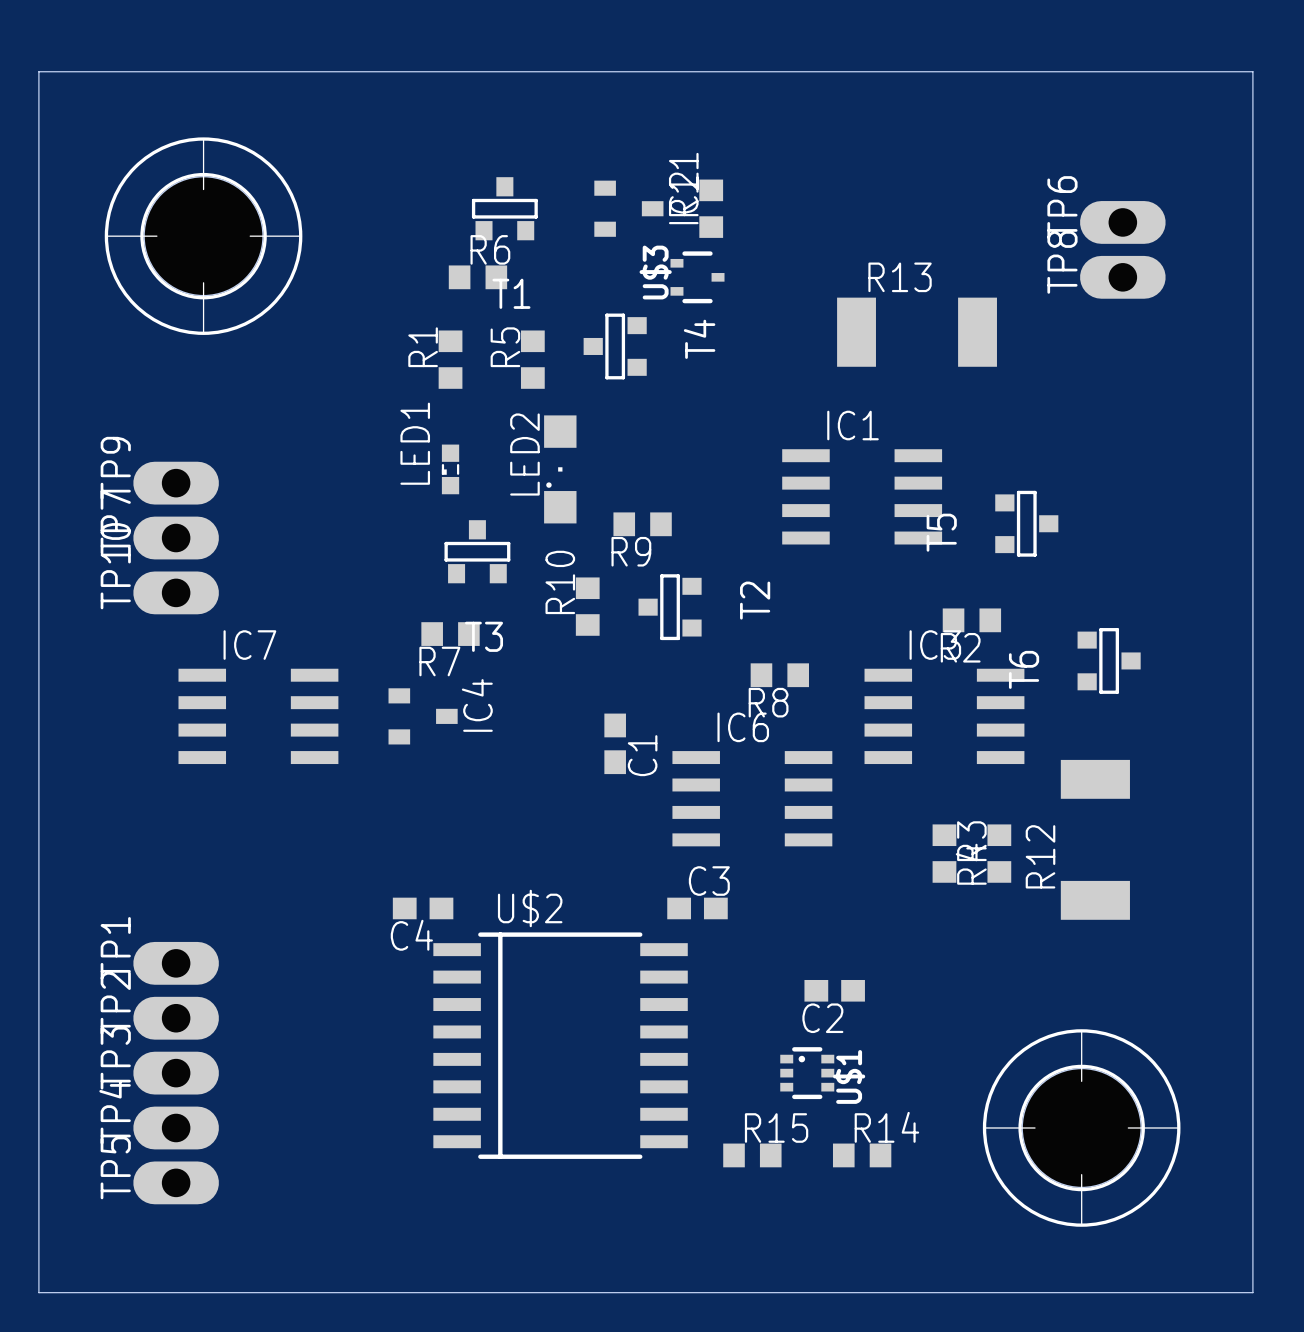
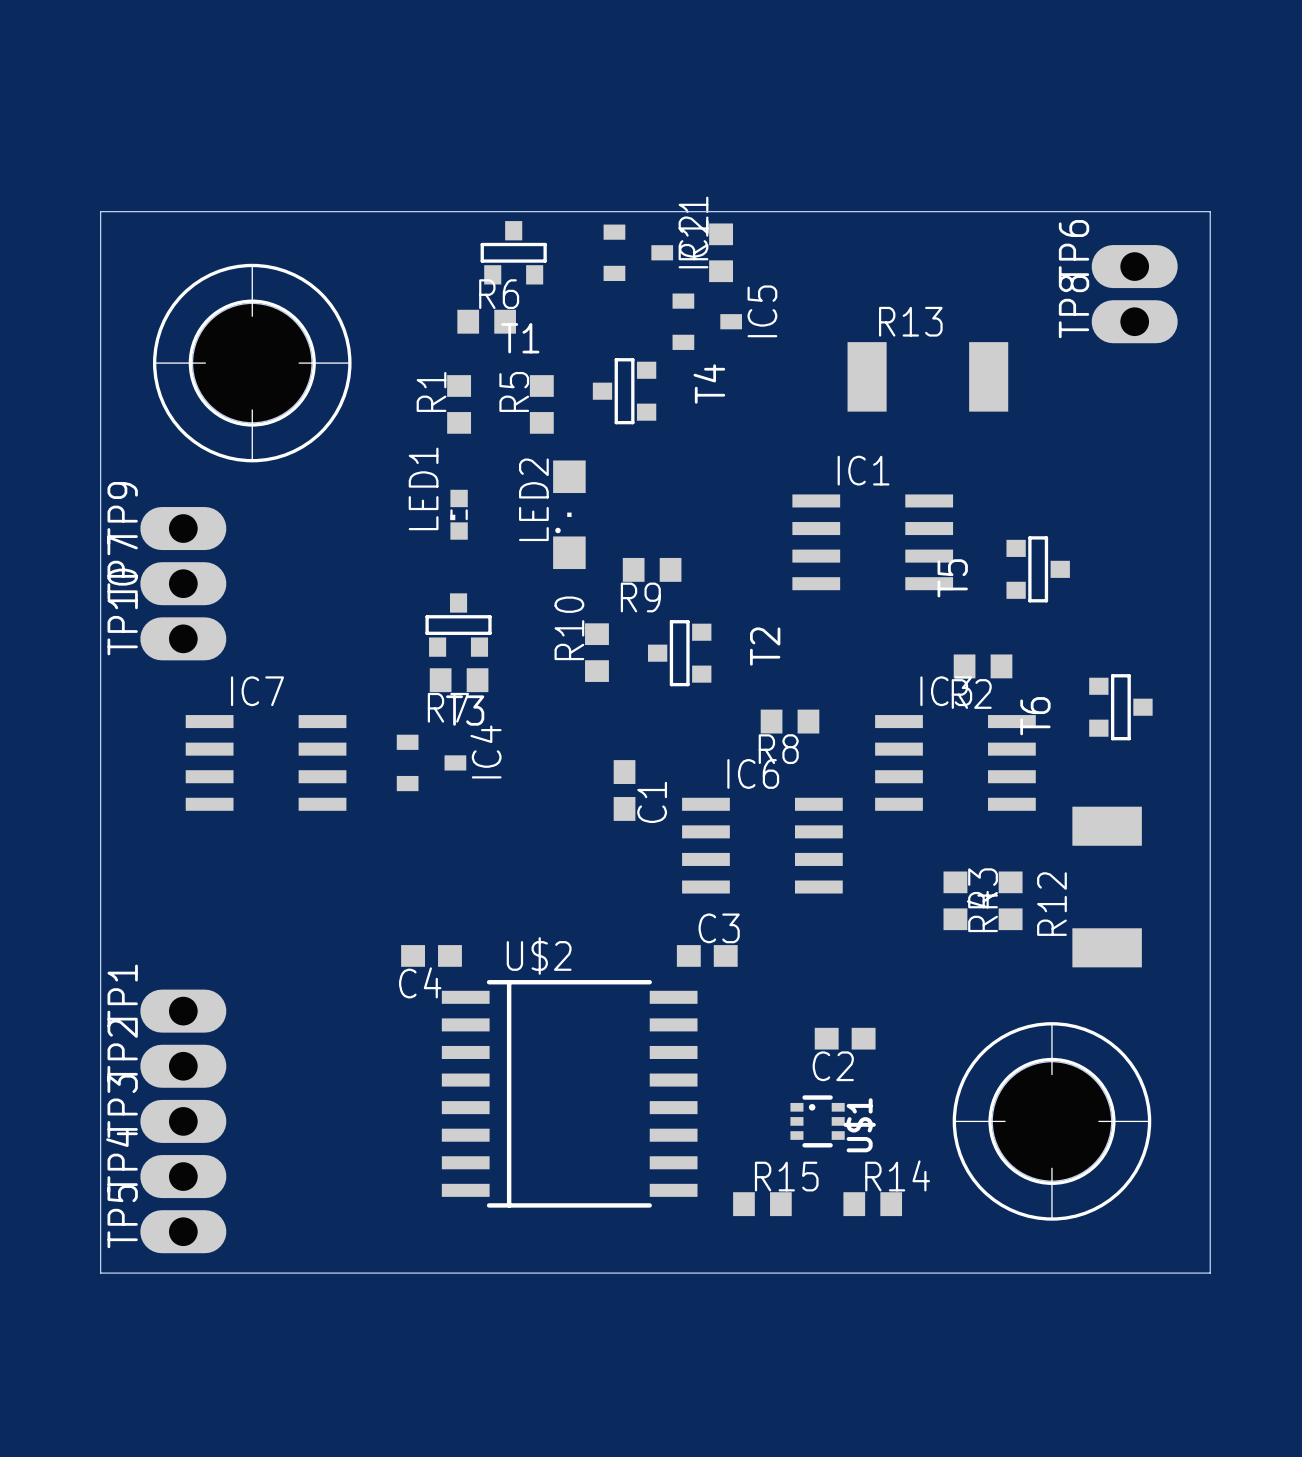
board edge: (38, 71) (1252, 71) (1252, 1292) (38, 1292) (38, 71) -> (100, 211) (100, 1273) (1210, 1273) (1210, 211) (100, 211)
part position: (203, 236) -> (252, 363)
U$3: (697, 277) -> none
IC5: none -> (707, 321)
T3 position: (477, 551) -> (458, 625)
part position: (1081, 1128) -> (1051, 1121)

